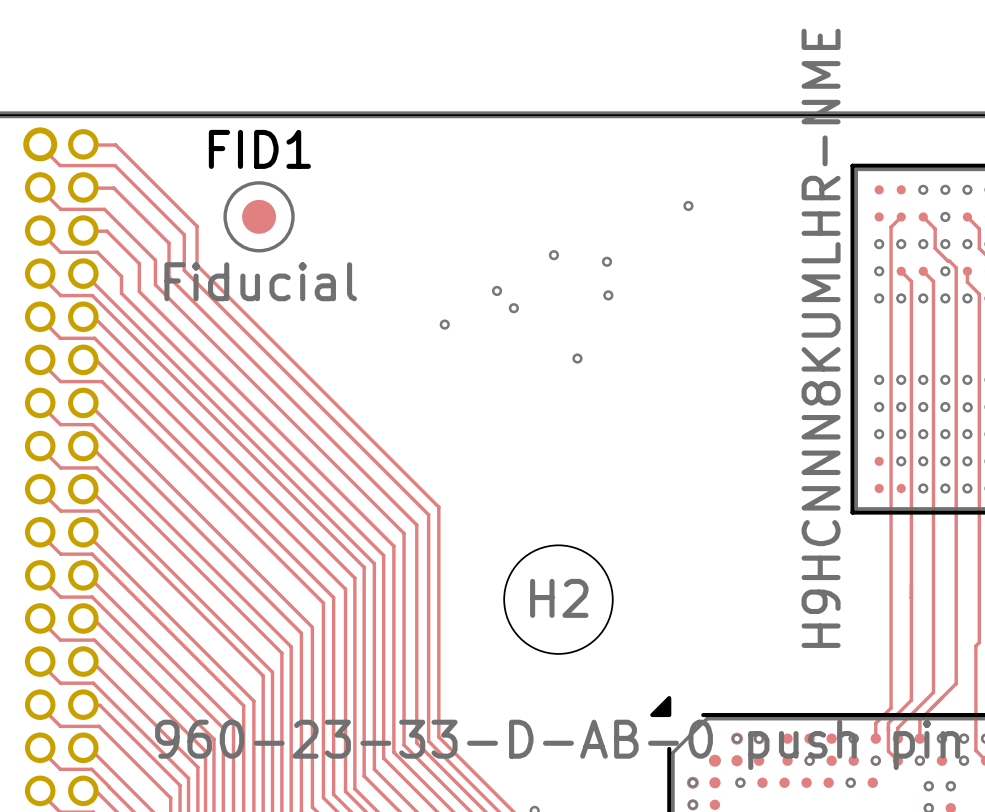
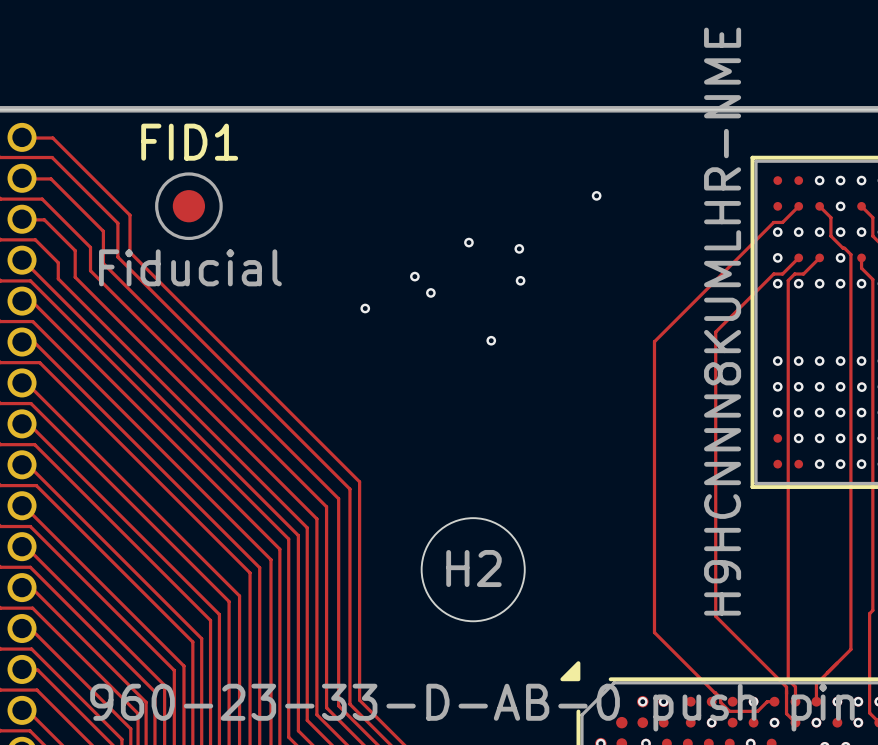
track: (891, 227) (891, 708) (875, 723) (875, 738) -> (789, 216) (782, 222) (773, 222) (654, 341) (654, 632) (720, 698) (720, 702) (729, 711) (757, 711) (767, 701) (774, 701)
track: (901, 271) (911, 281) (911, 700) (888, 723) -> (798, 257) (782, 274) (773, 274) (715, 332) (715, 616) (786, 687)
track: (923, 271) (933, 281) (933, 692) (897, 728) -> (819, 257) (803, 274) (794, 274) (788, 280) (788, 679) (795, 686) (795, 691)

